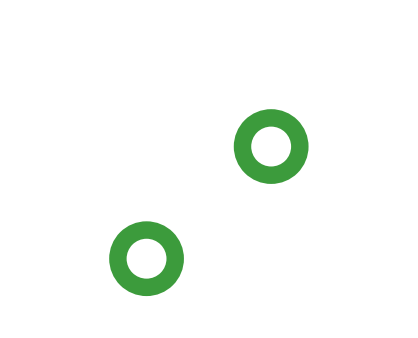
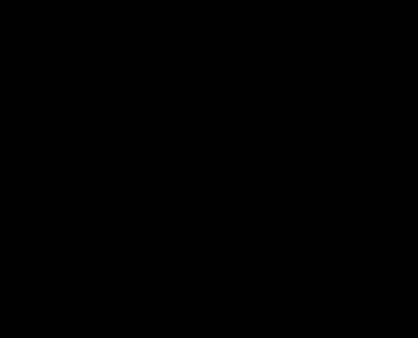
part: (271, 146) -> none
part: (146, 258) -> none

